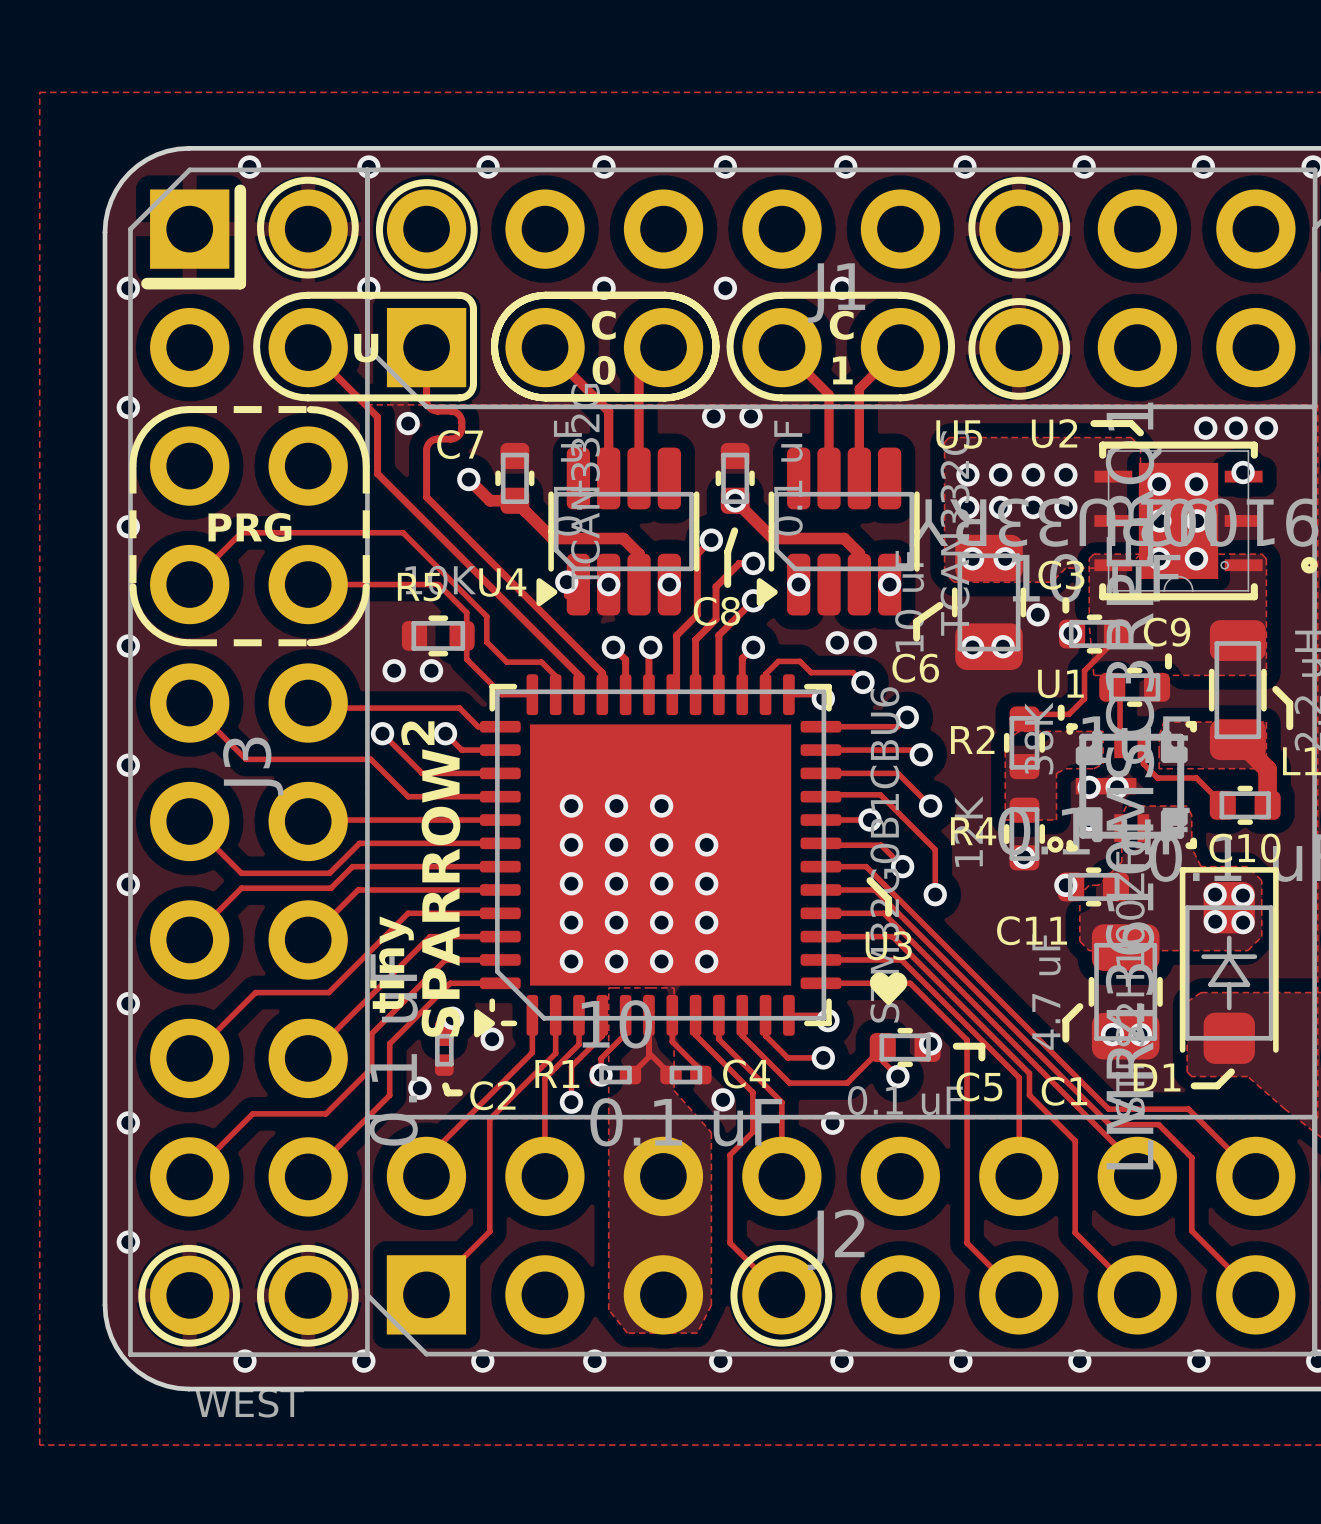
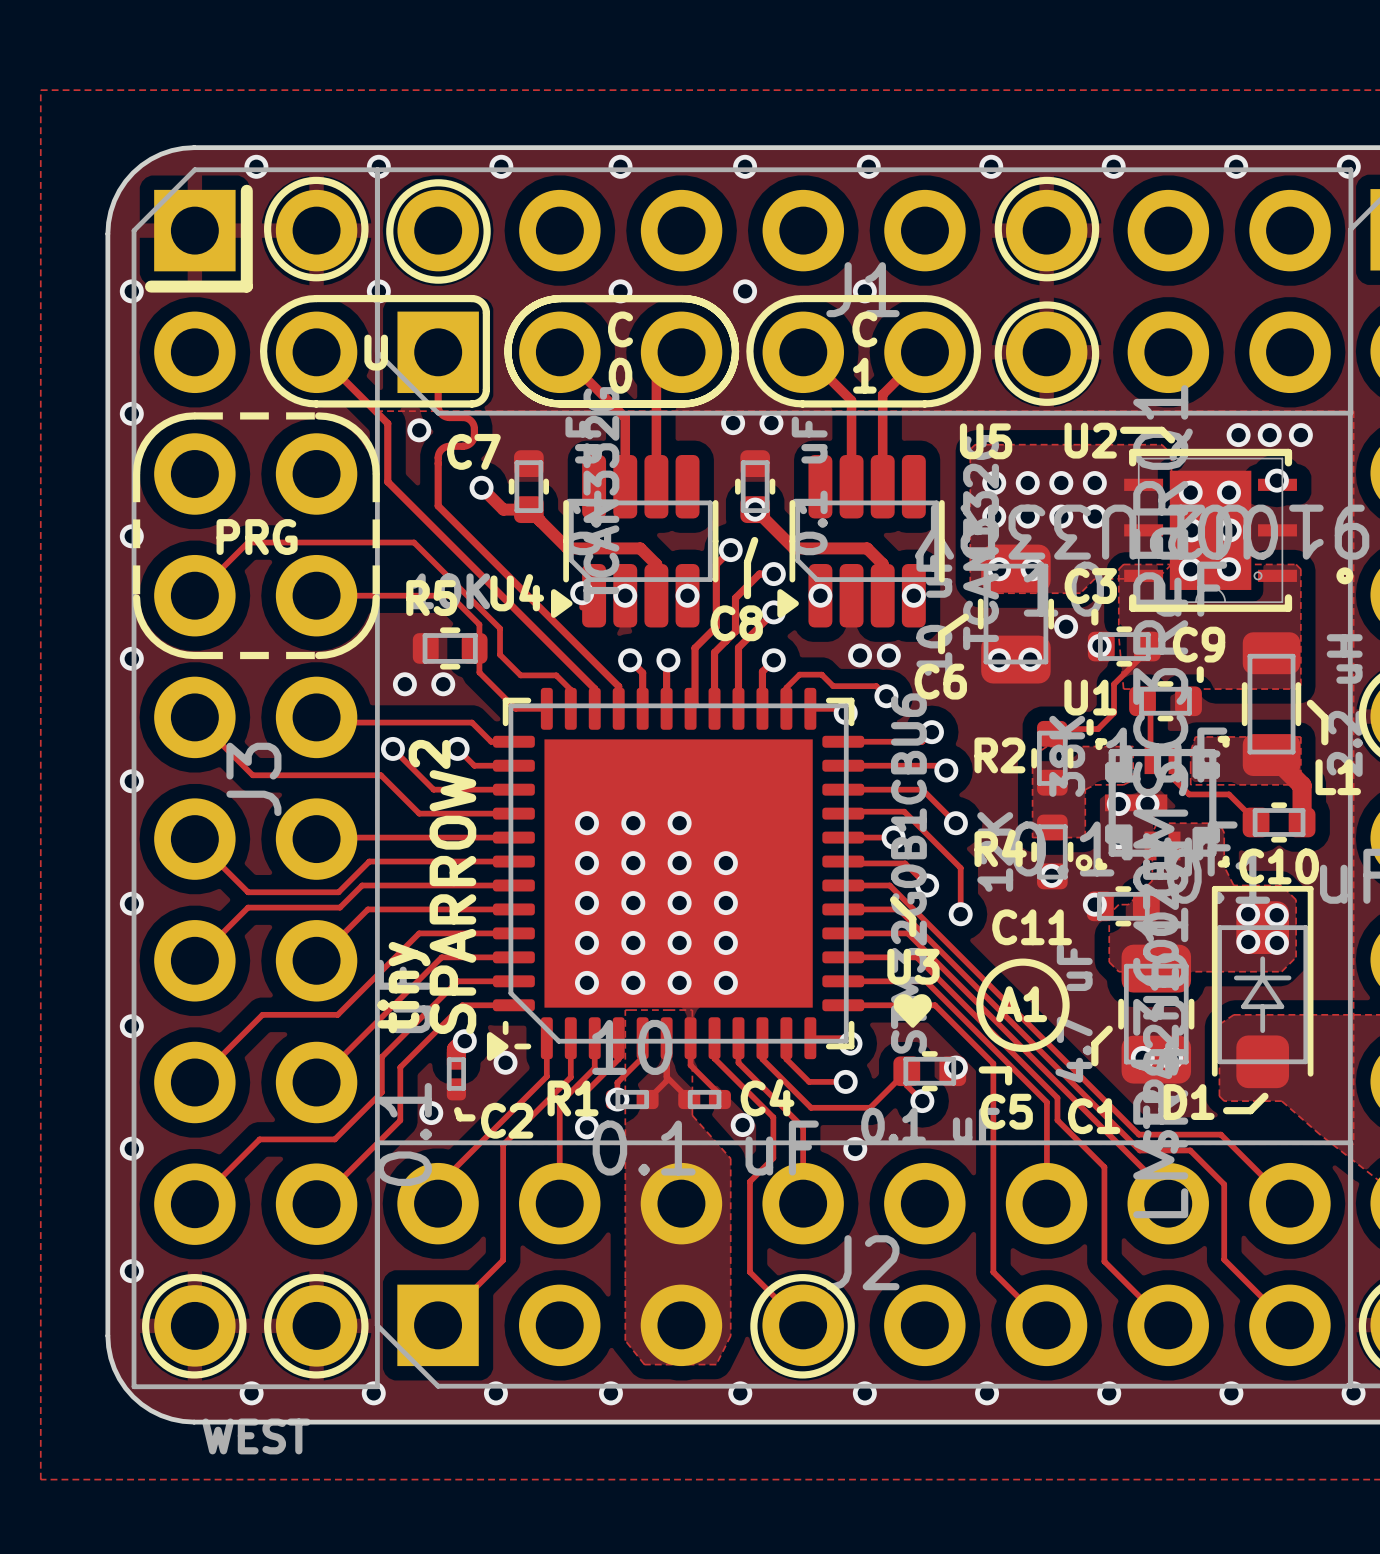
C11 name position: C11 (1032, 930) -> C11 (1032, 927)
drawing: none -> [976, 958, 1070, 1052]
text: none -> A1 (1021, 1004)

